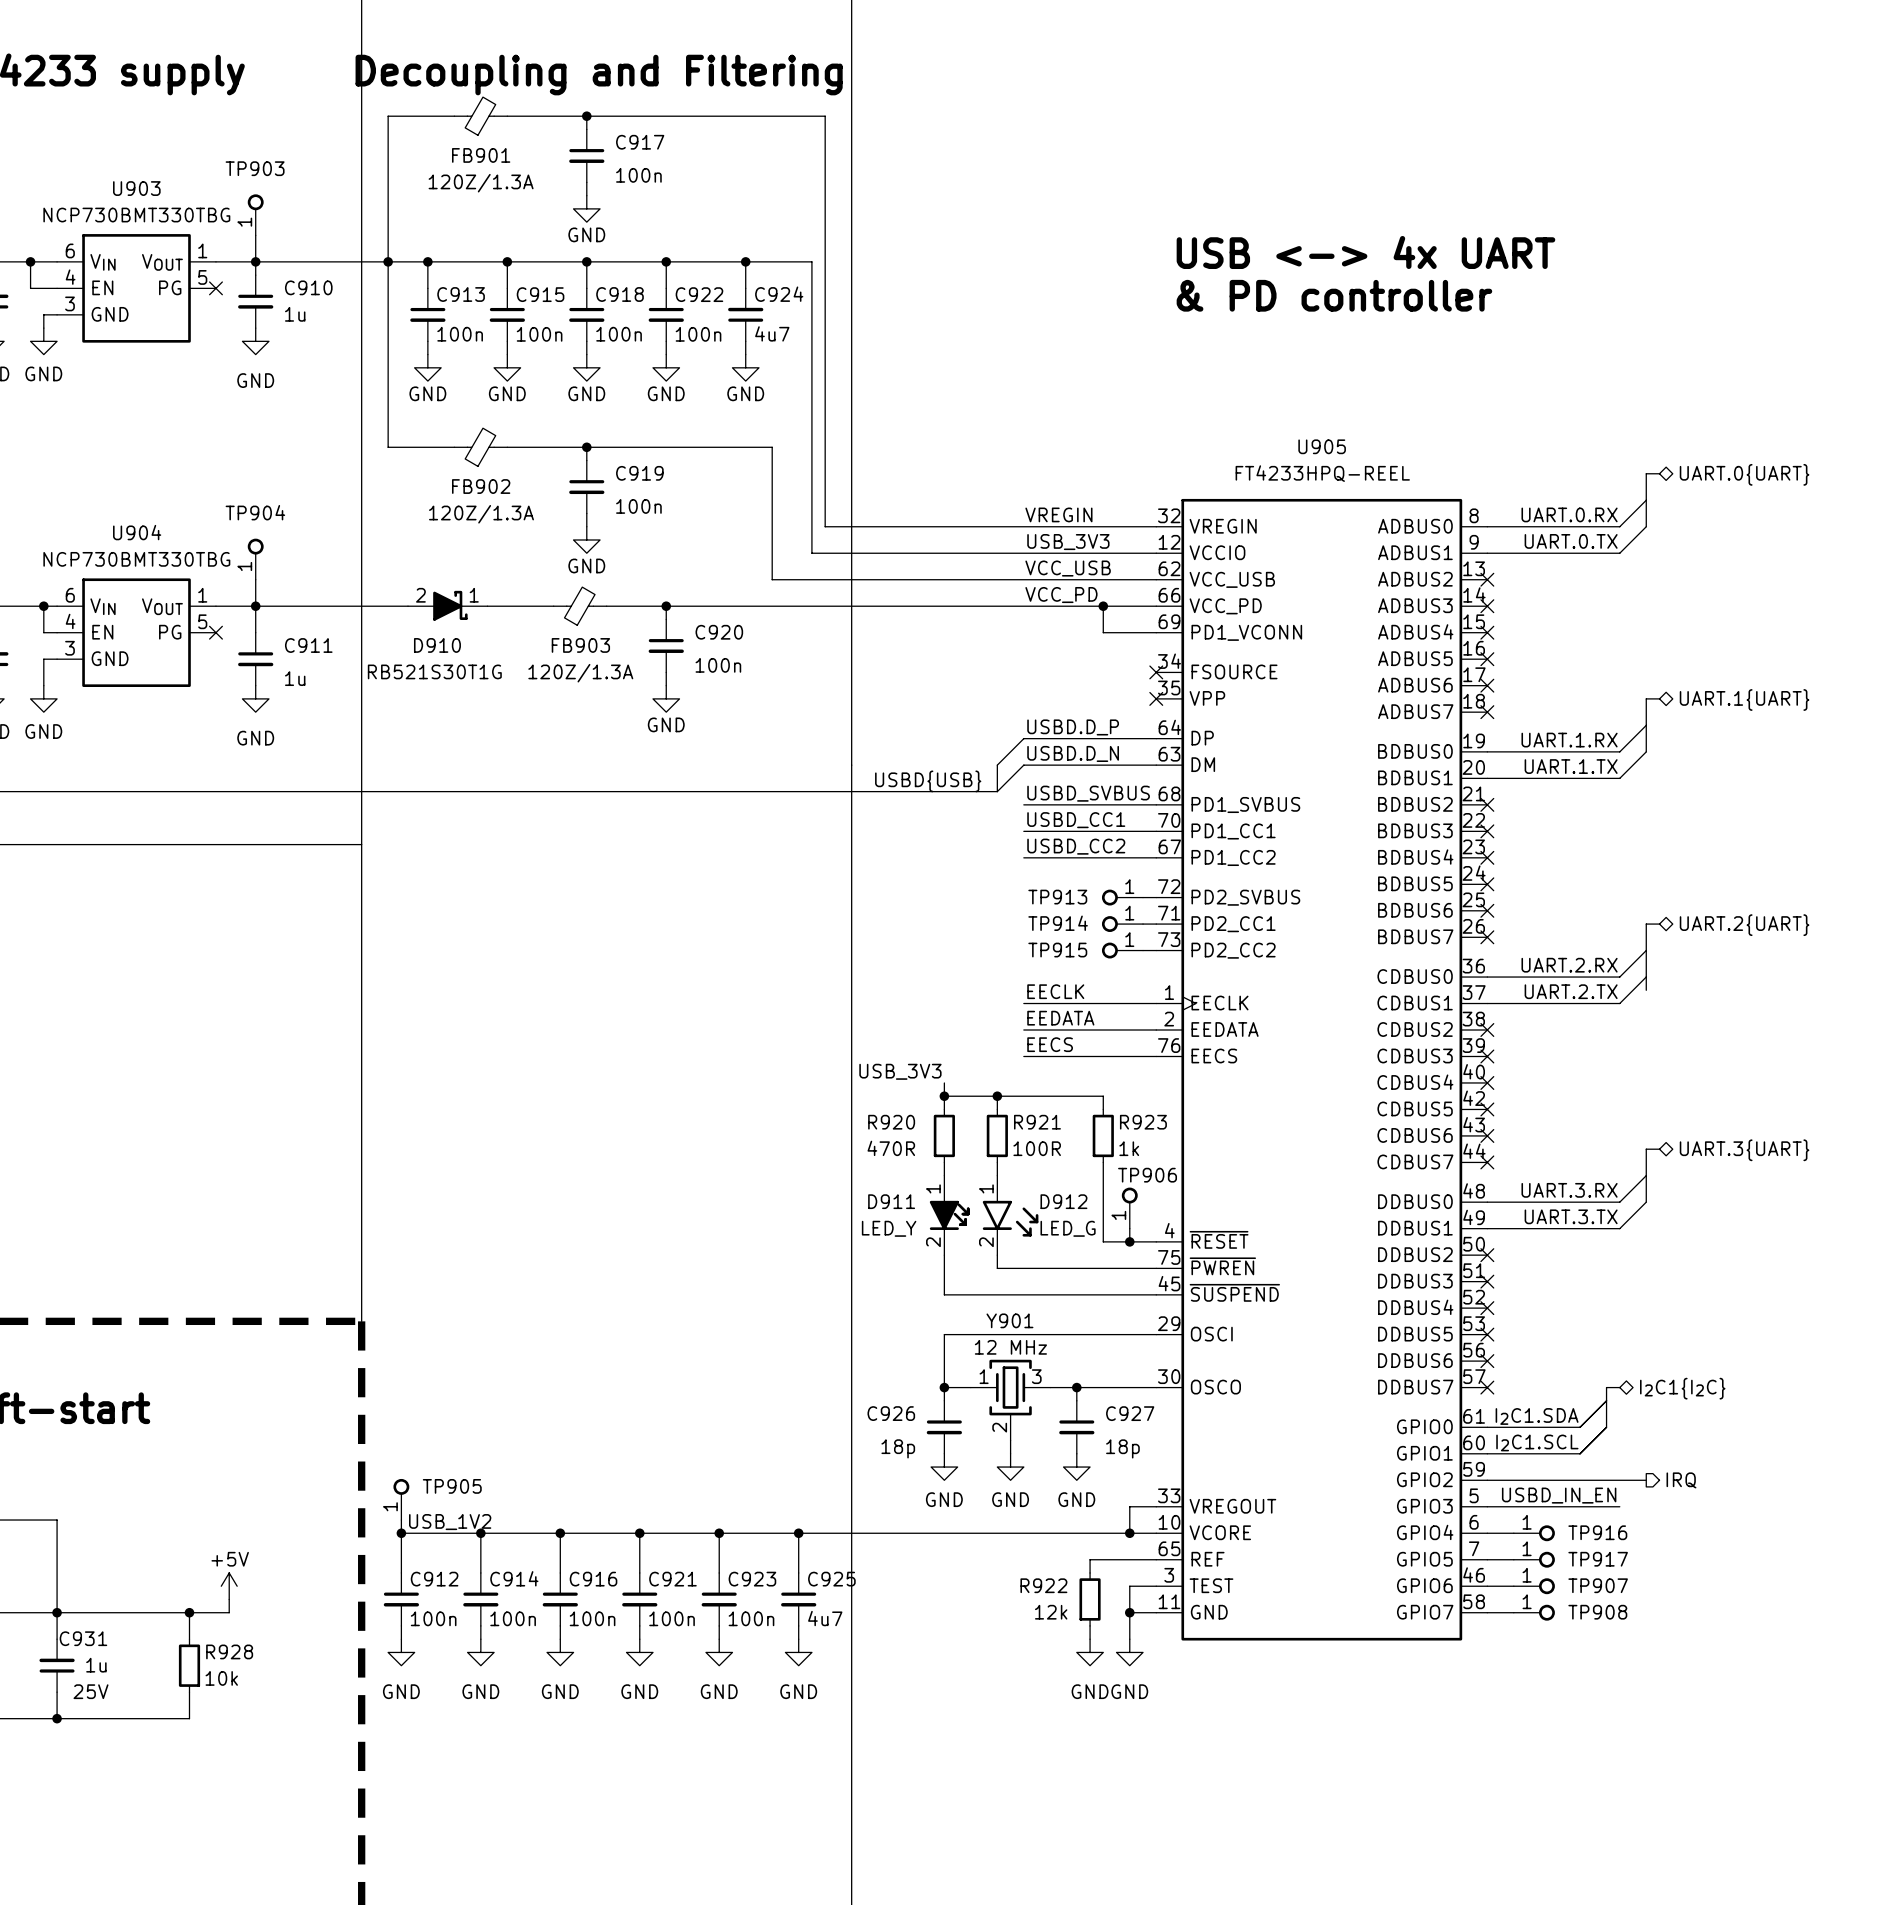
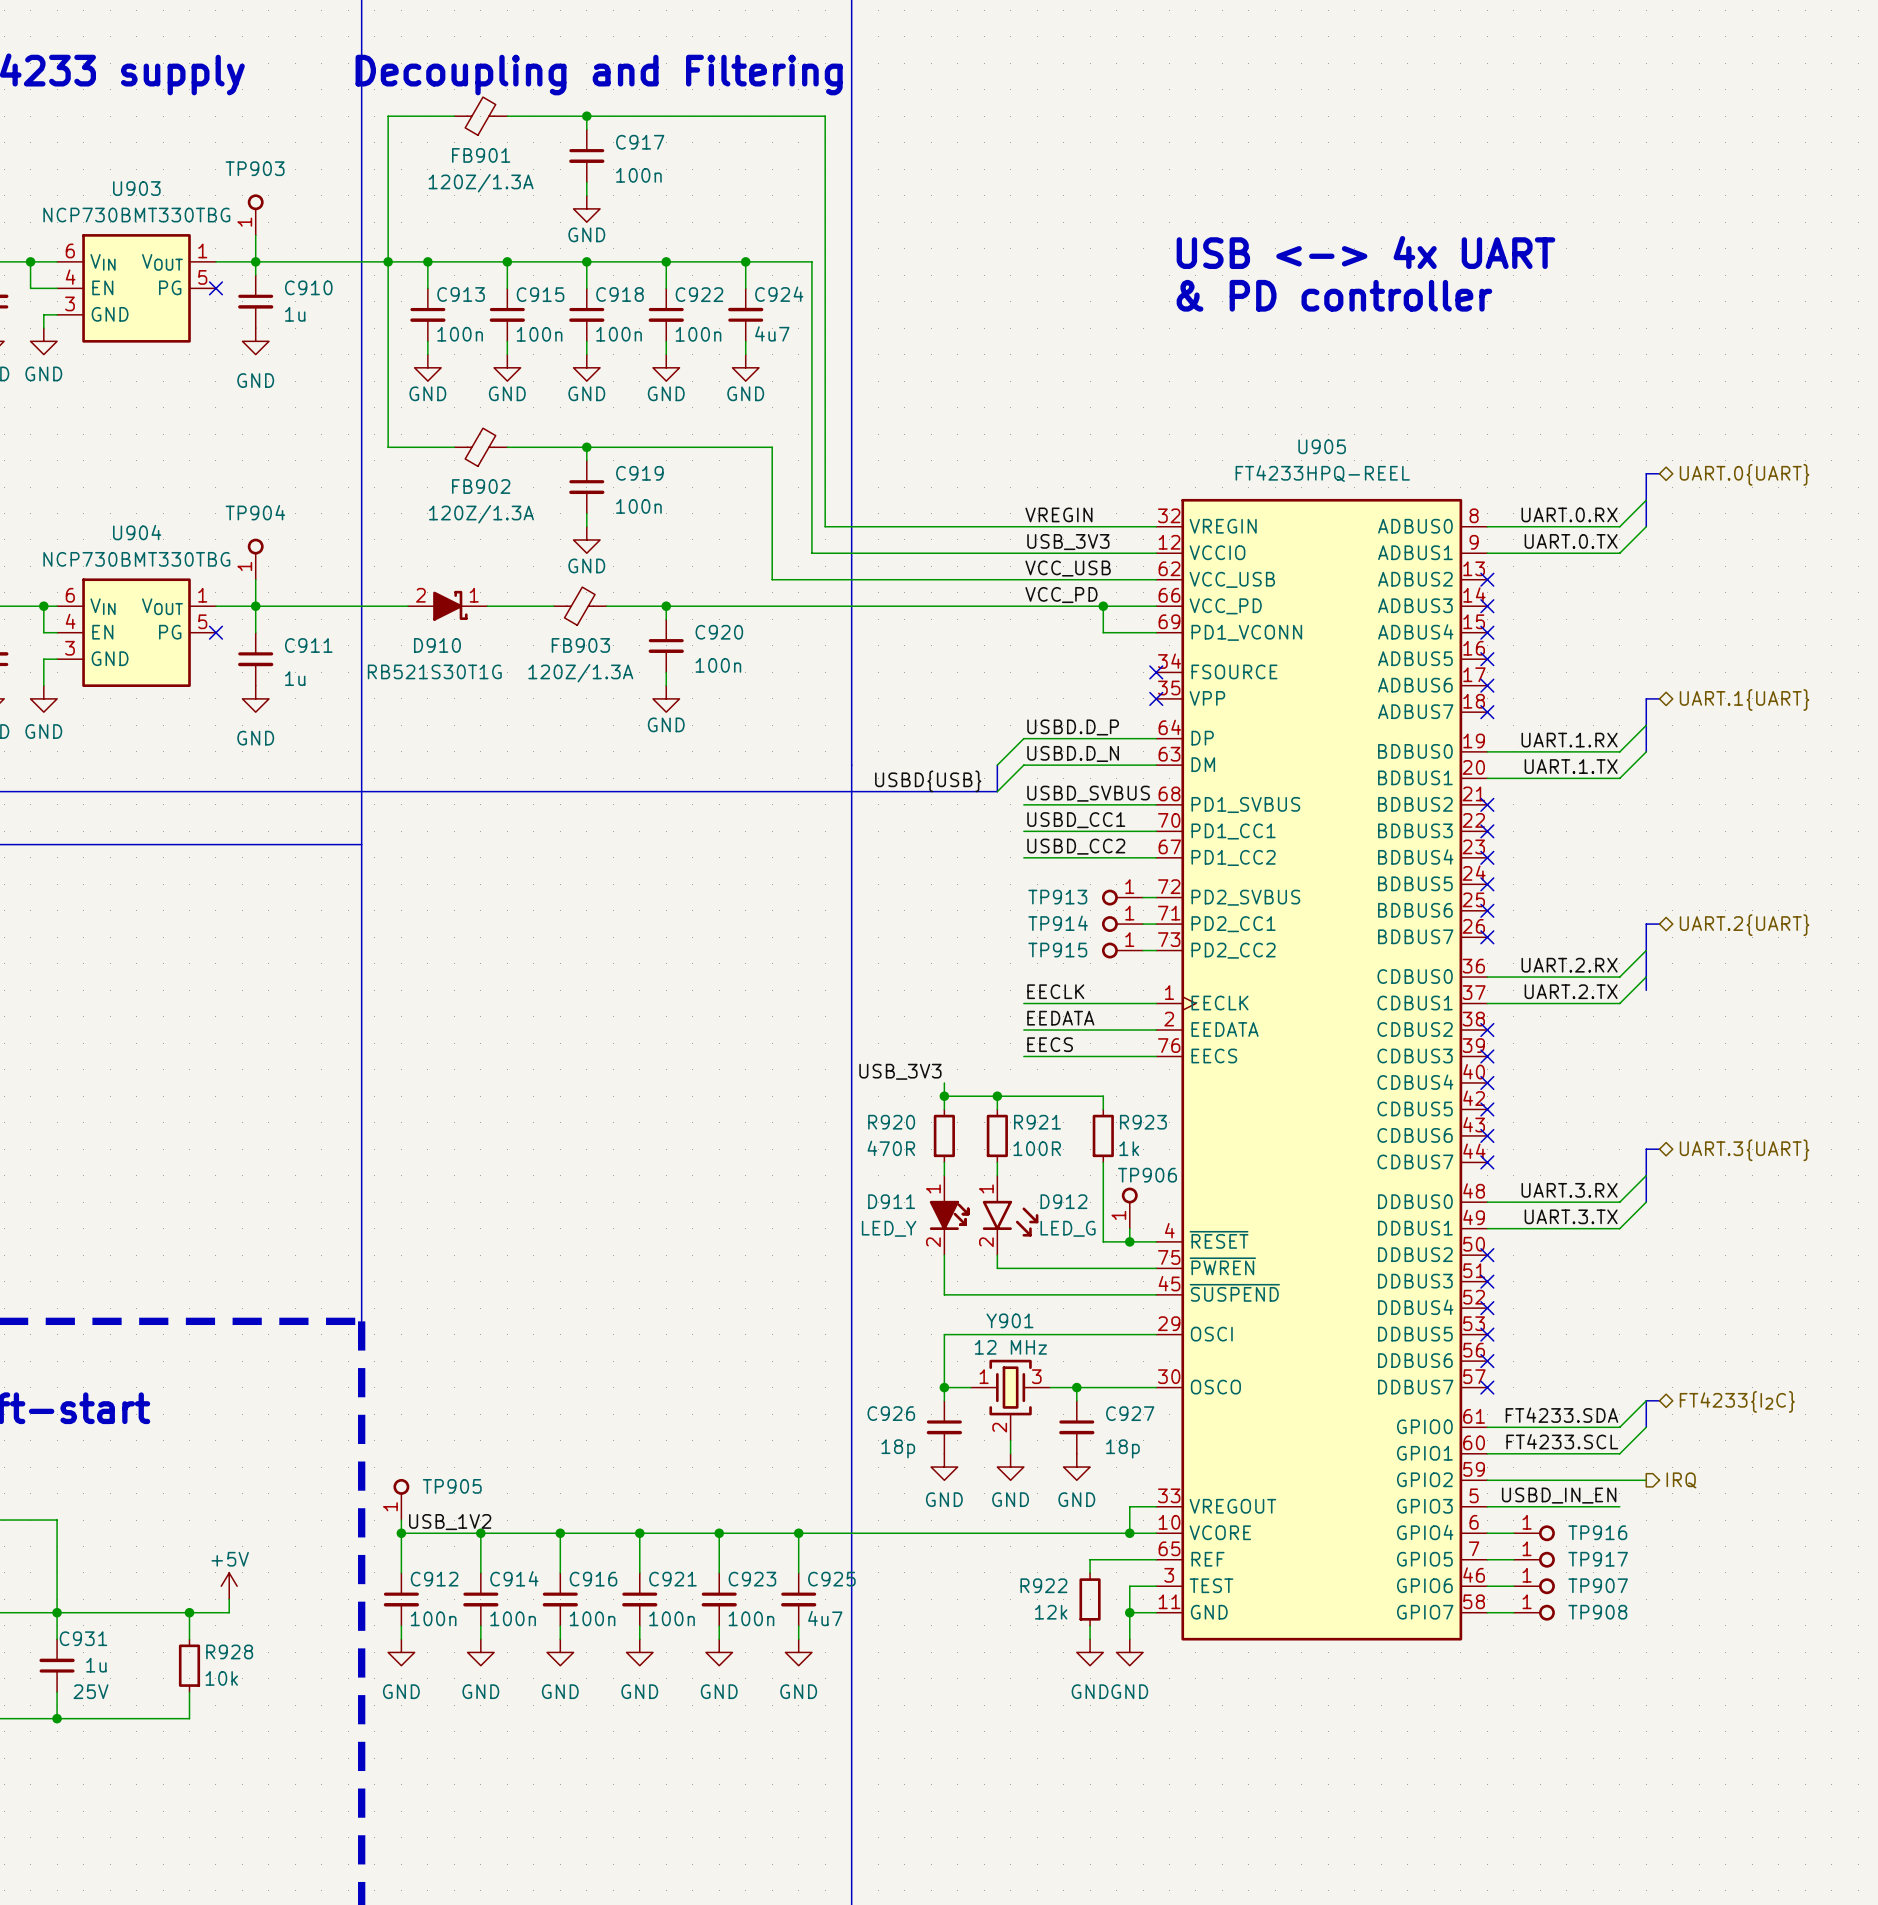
bus: (1619, 1387) (1606, 1387) (1606, 1427) -> none
hierarchical label: I2C1{I2C} (1682, 1388) -> FT4233{I2C} (1737, 1401)
wire: (1606, 1400) (1580, 1427) -> (1646, 1400) (1619, 1427) (1580, 1427)
bus: none -> (1659, 1400) (1646, 1400) (1646, 1427)
label: none -> FT4233.SDA (1561, 1415)
label: I2C1.SDA (1537, 1416) -> none
wire: (1606, 1427) (1580, 1453) -> (1646, 1427) (1619, 1453) (1580, 1453)
label: none -> FT4233.SCL (1562, 1441)
label: I2C1.SCL (1537, 1442) -> none

